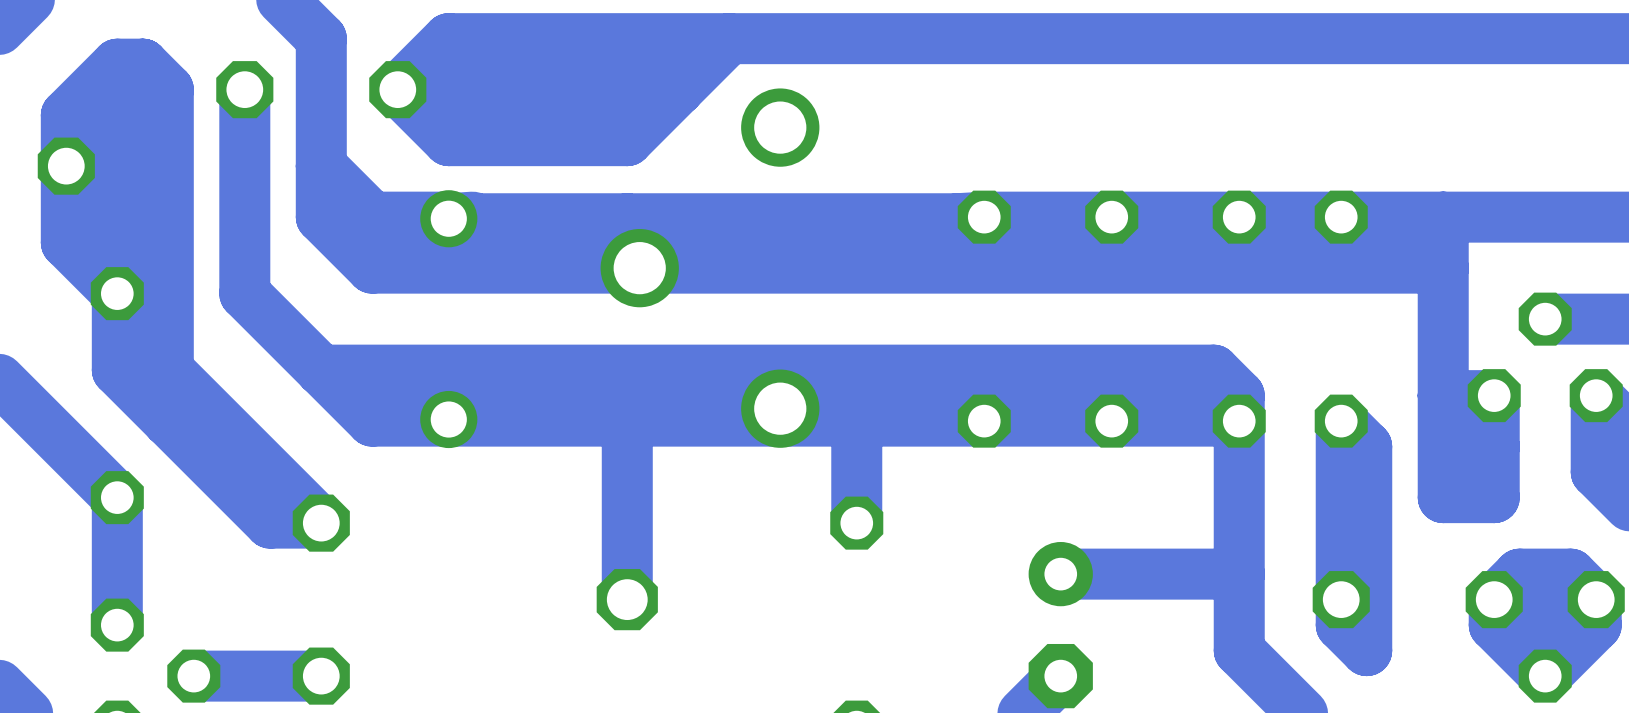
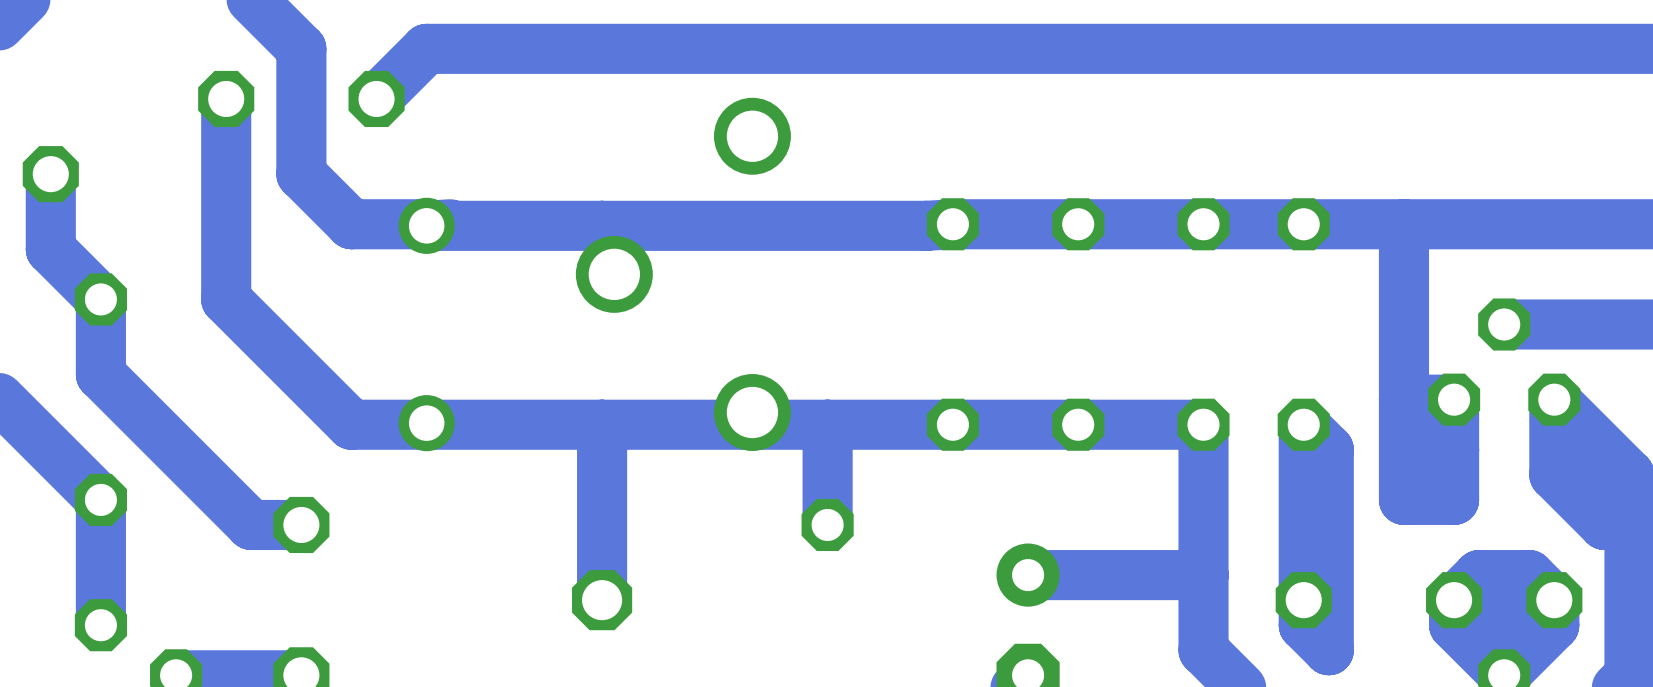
bottom track: (729, 38) (627, 140) (448, 140) (397, 89) (678, 89) -> none
bottom track: (142, 64) (117, 64) (66, 115) (66, 166) -> none
bottom track: (142, 64) (117, 89) (117, 293) -> none
bottom track: (142, 64) (168, 89) (168, 421) -> none
bottom track: (321, 166) (321, 217) (372, 268) (1443, 268) -> none
bottom track: (168, 370) (321, 523) -> none
bottom track: (321, 370) (1213, 370) (1239, 395) (1239, 421) -> none

